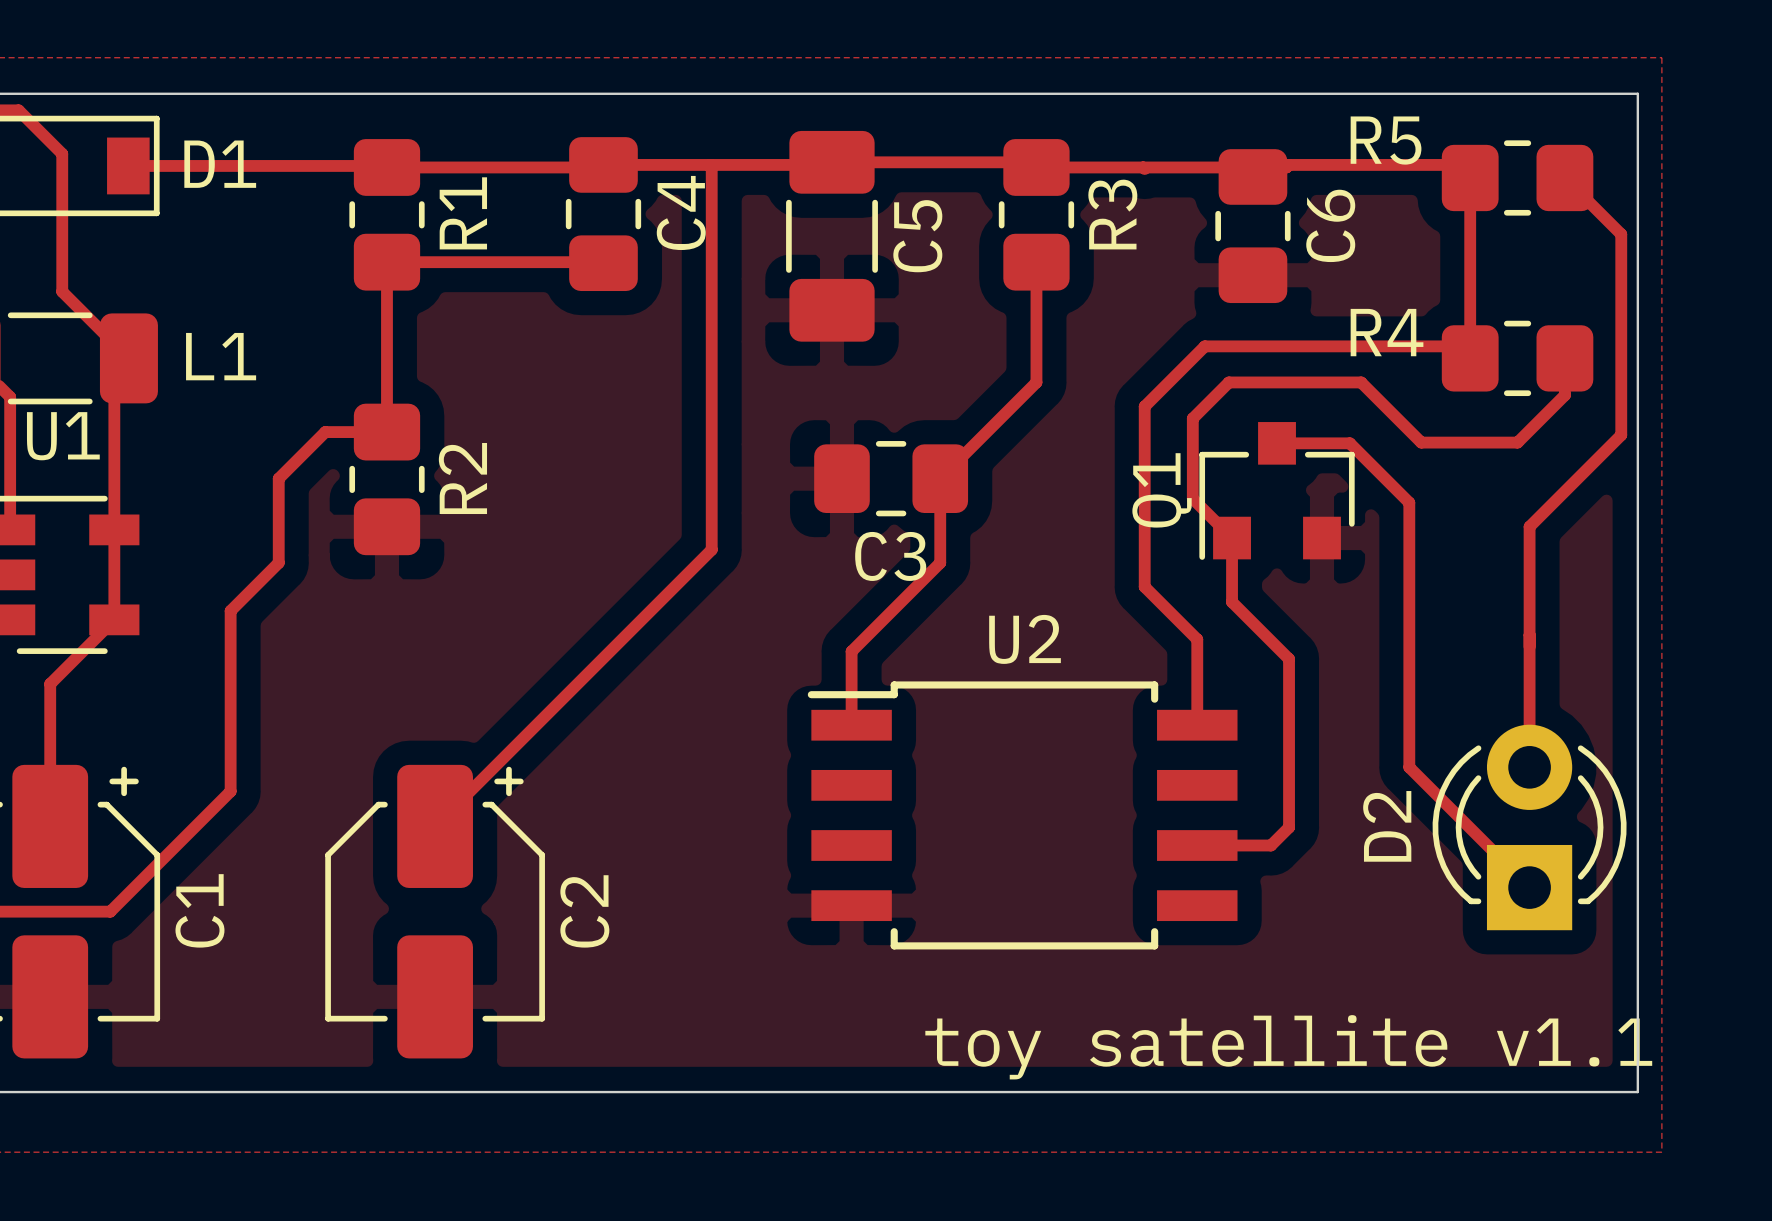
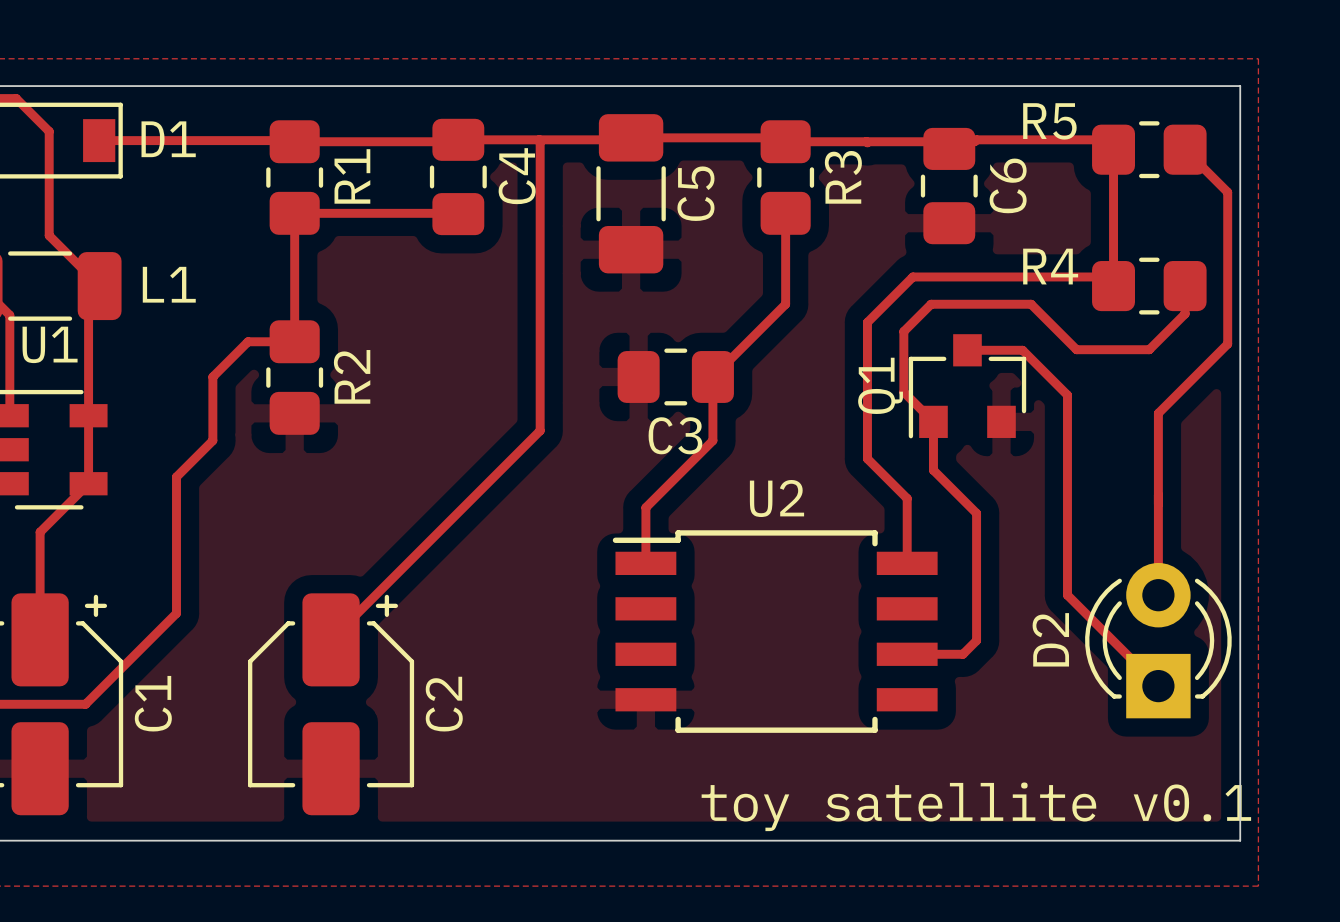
text: toy satellite v1.1 (1288, 1047) -> toy satellite v0.1 (976, 806)

